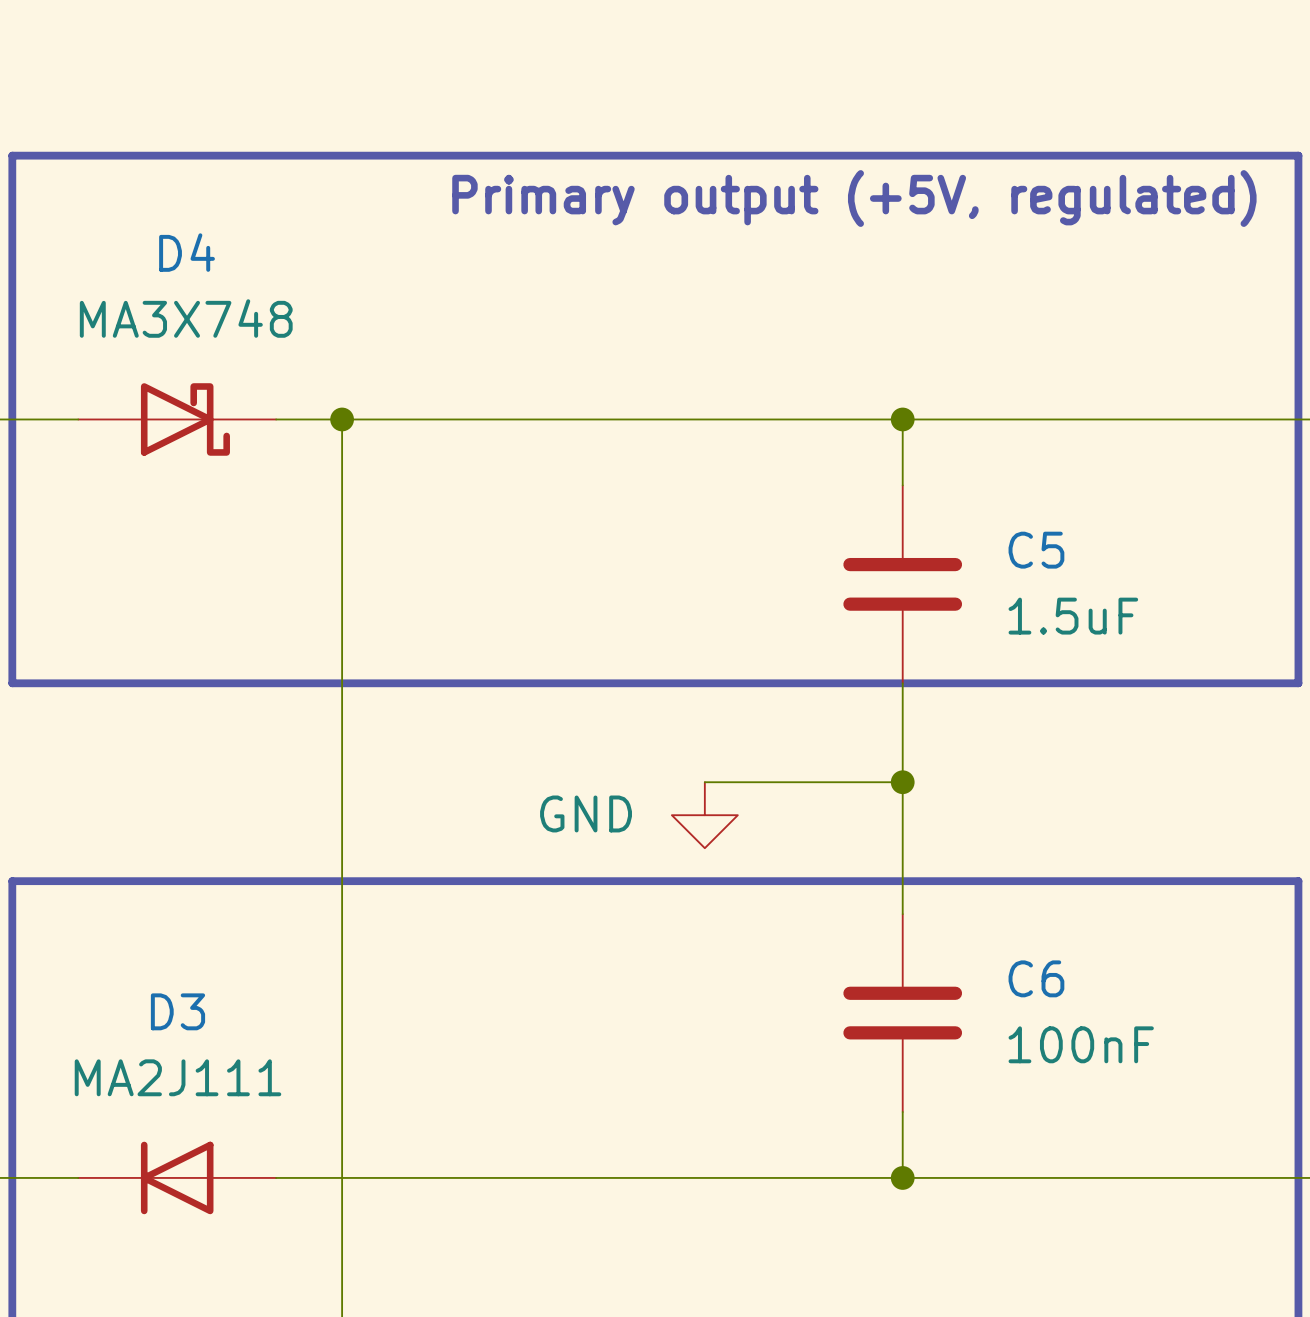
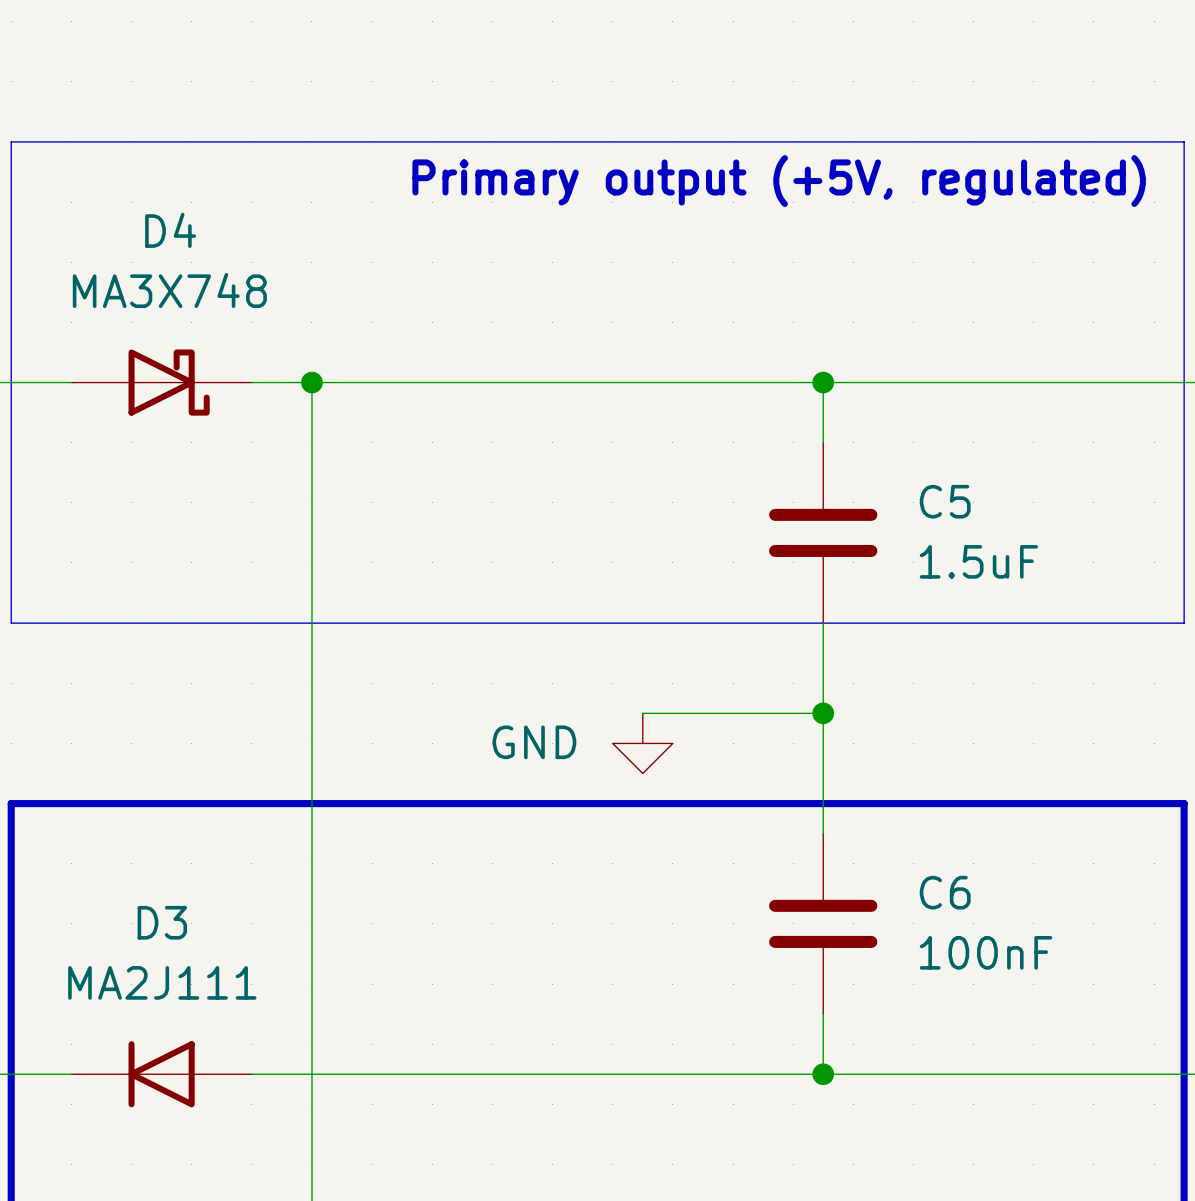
line width: thick (12, 155) (1298, 155) (1298, 683) (12, 683) (12, 155) -> thin (11, 141) (1184, 141) (1184, 623) (11, 623) (11, 141)

